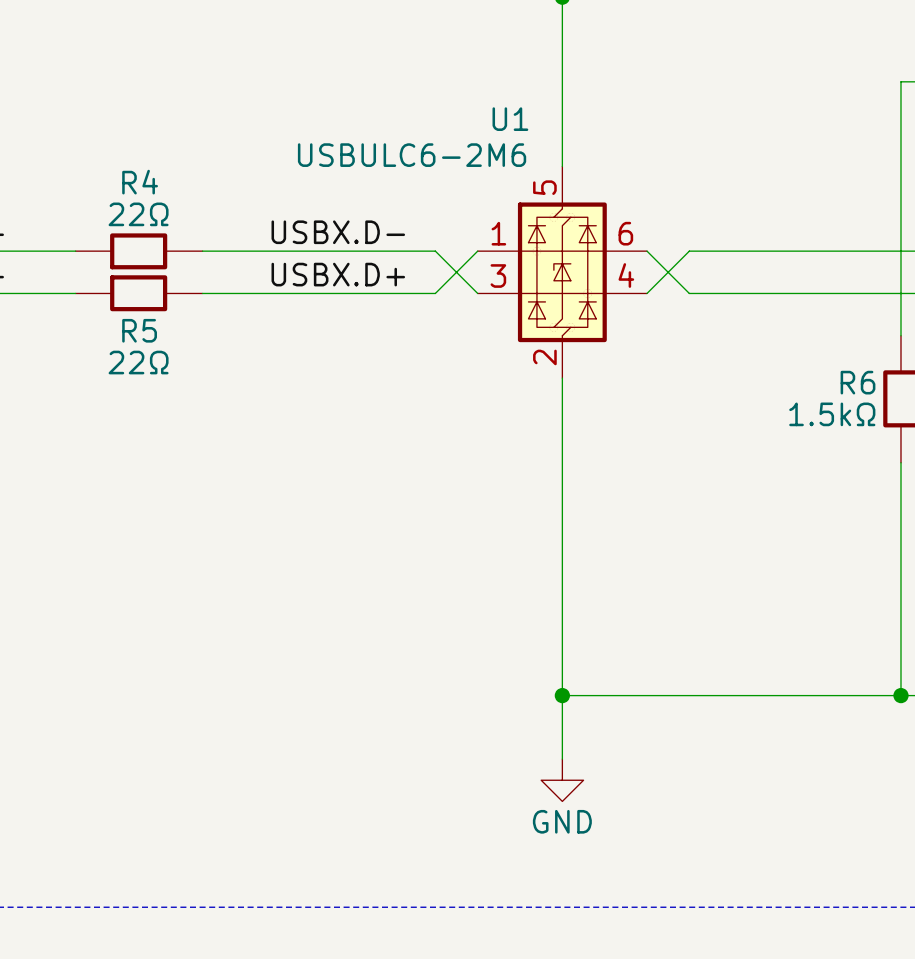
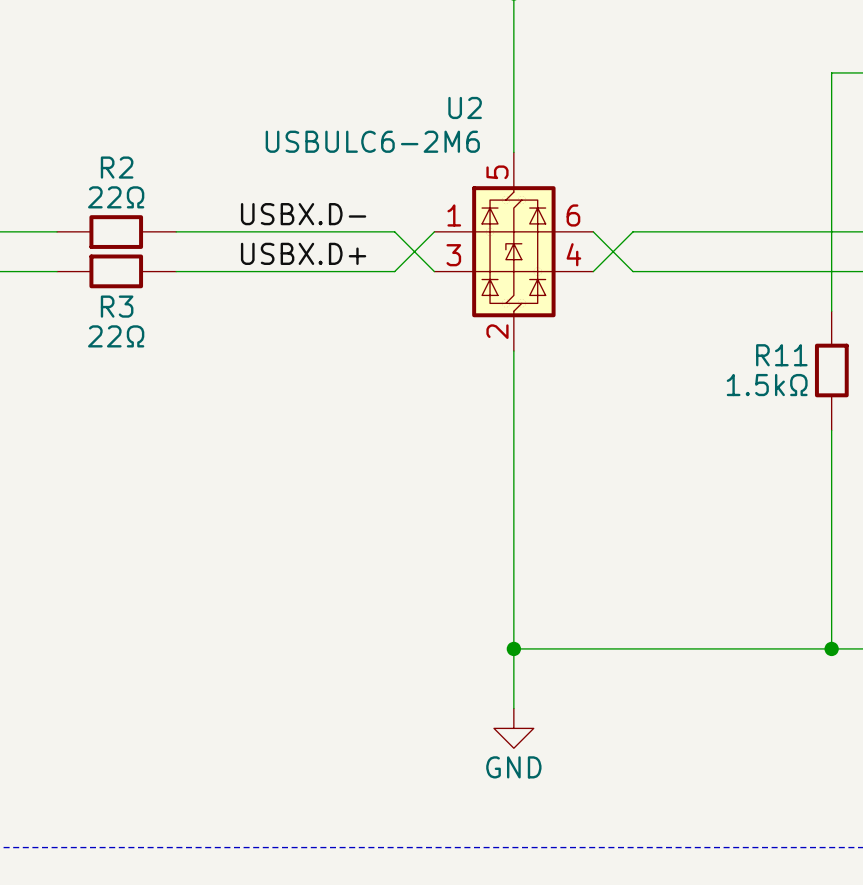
U1 name: U1 (510, 119) -> U2 (465, 107)
R4 name: R4 (140, 182) -> R2 (117, 167)
R5 name: R5 (139, 330) -> R3 (117, 306)
R6 name: R6 (858, 382) -> R11 (781, 355)

